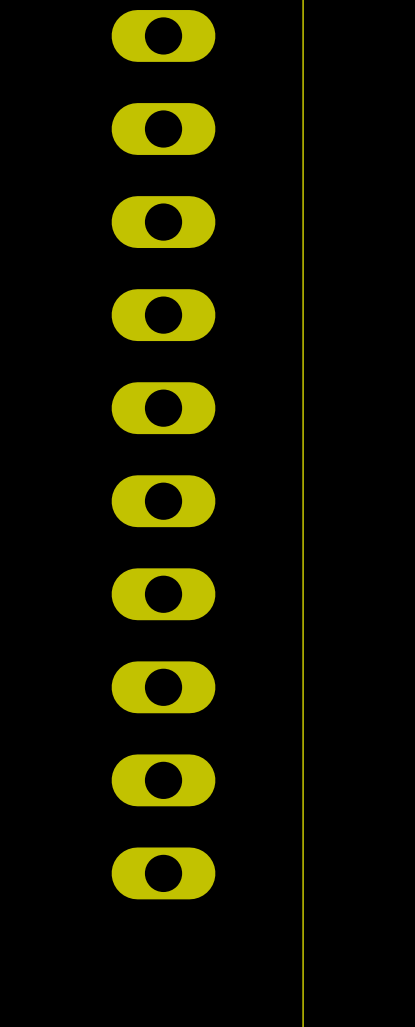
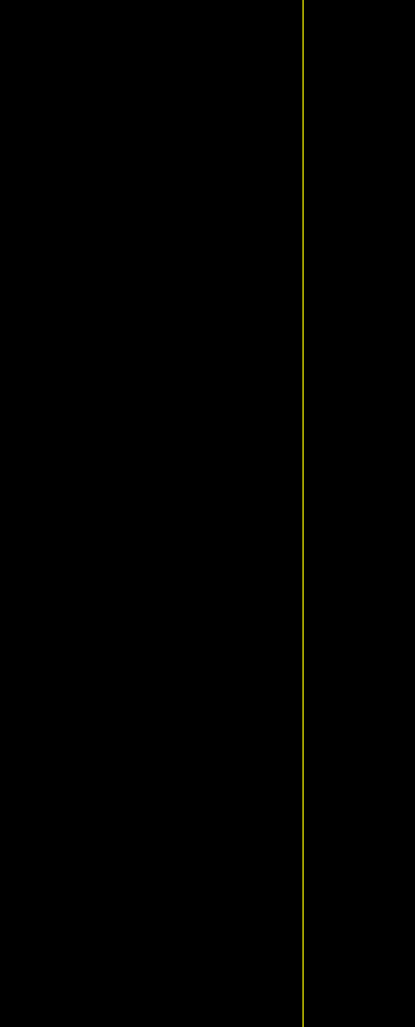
part: (163, 454) -> none

